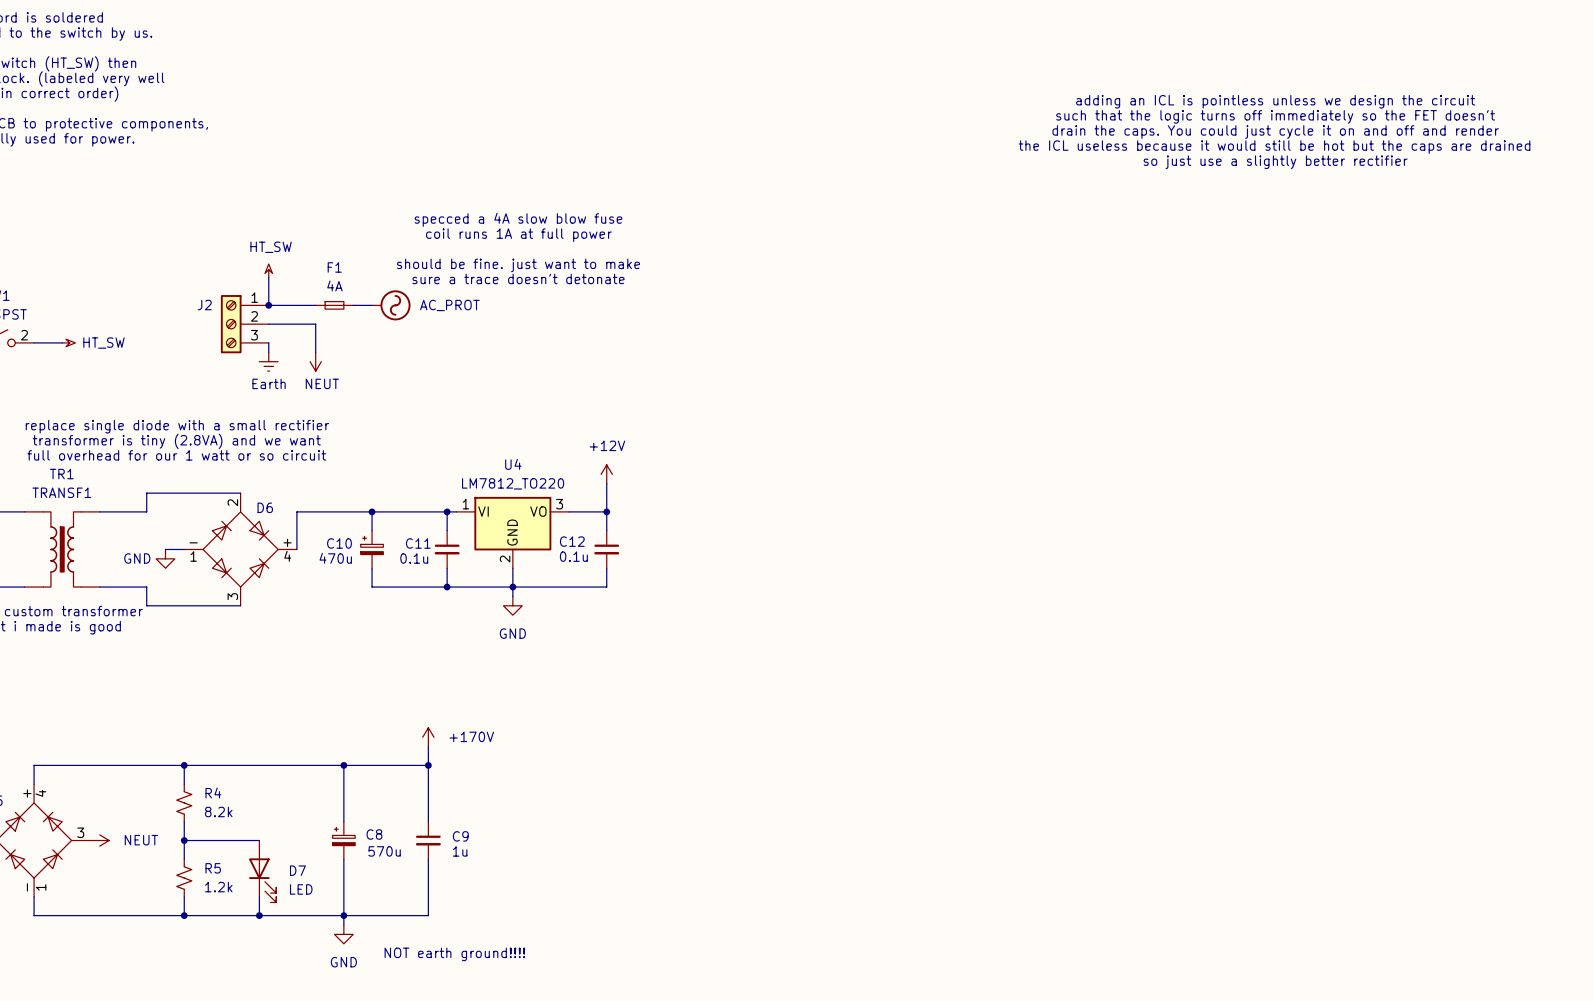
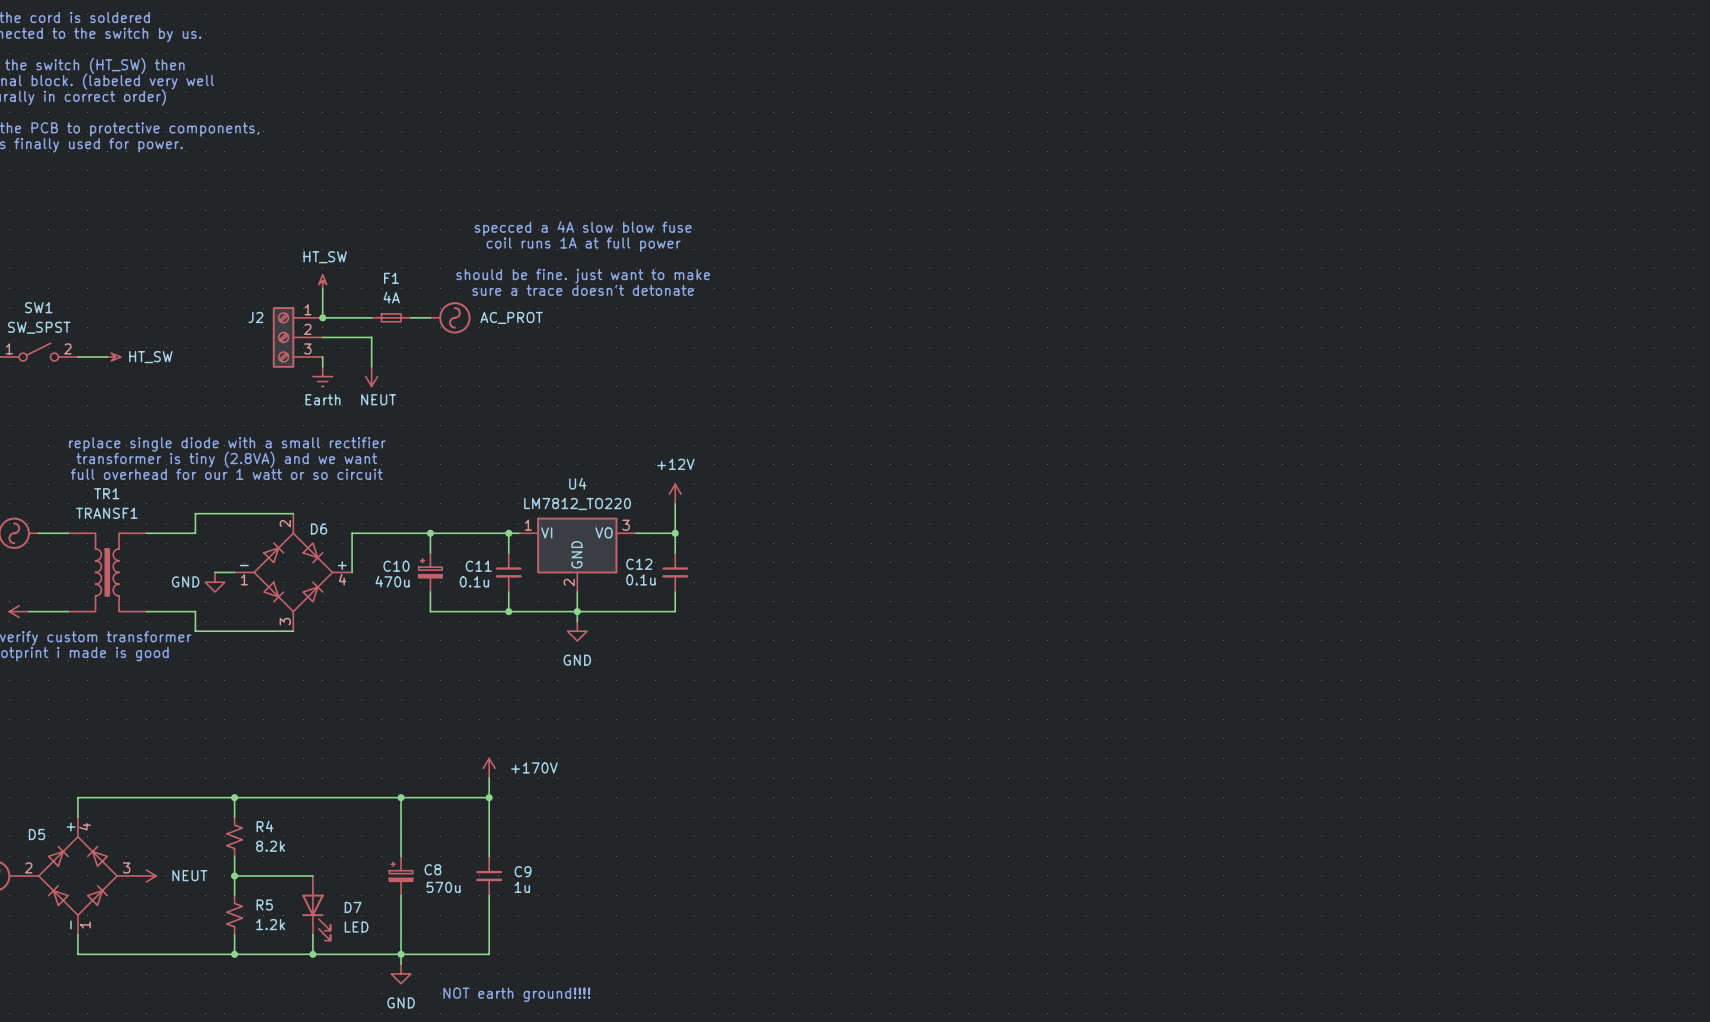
text: adding an ICL is pointless unless we design the circuit (1275, 101) -> none
text: such that the logic turns off immediately so the FET doesn't (1275, 116) -> none
text: drain the caps. You could just cycle it on and off and render (1275, 132) -> none
text: the ICL useless because it would still be hot but the caps are drained (1274, 147) -> none
text: so just use a slightly better rectifier (1275, 162) -> none

